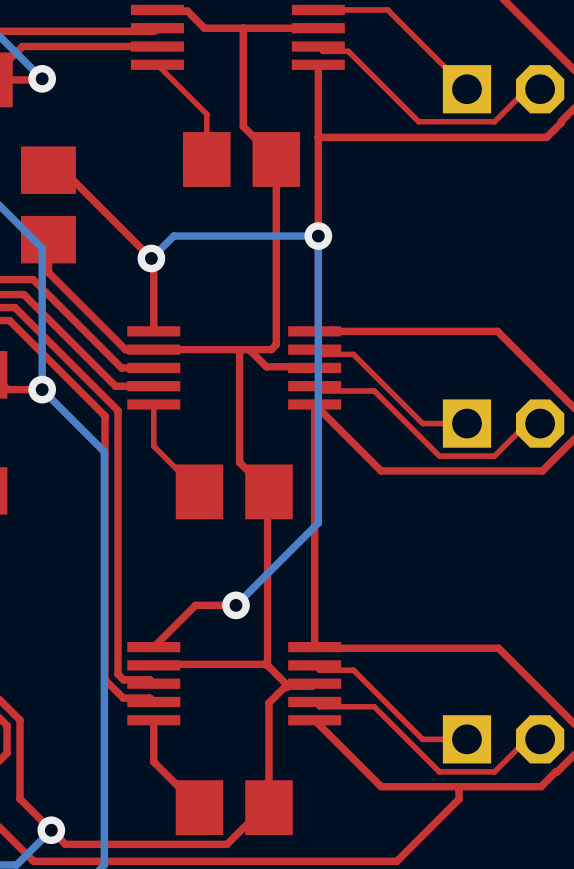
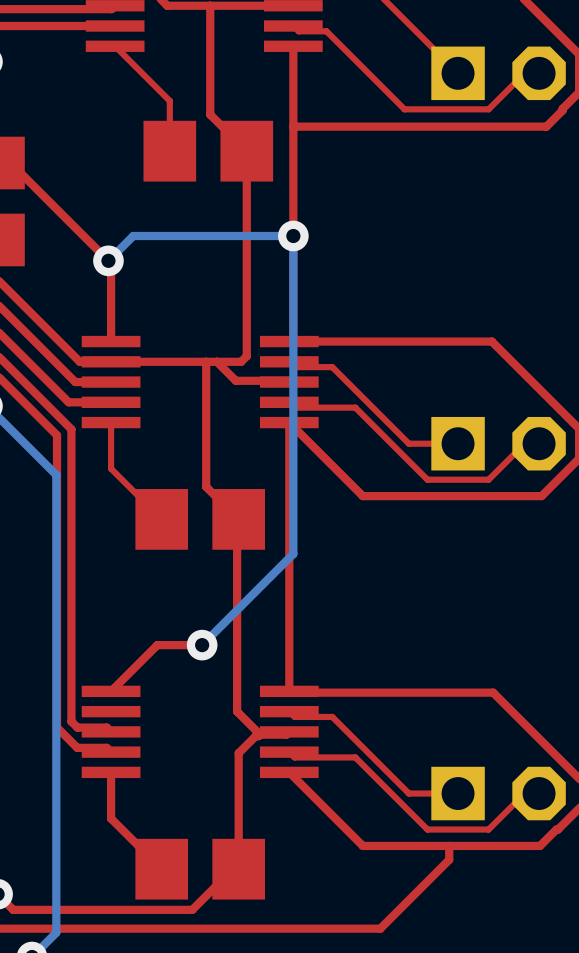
top track: (267, 665) (153, 665) -> none

